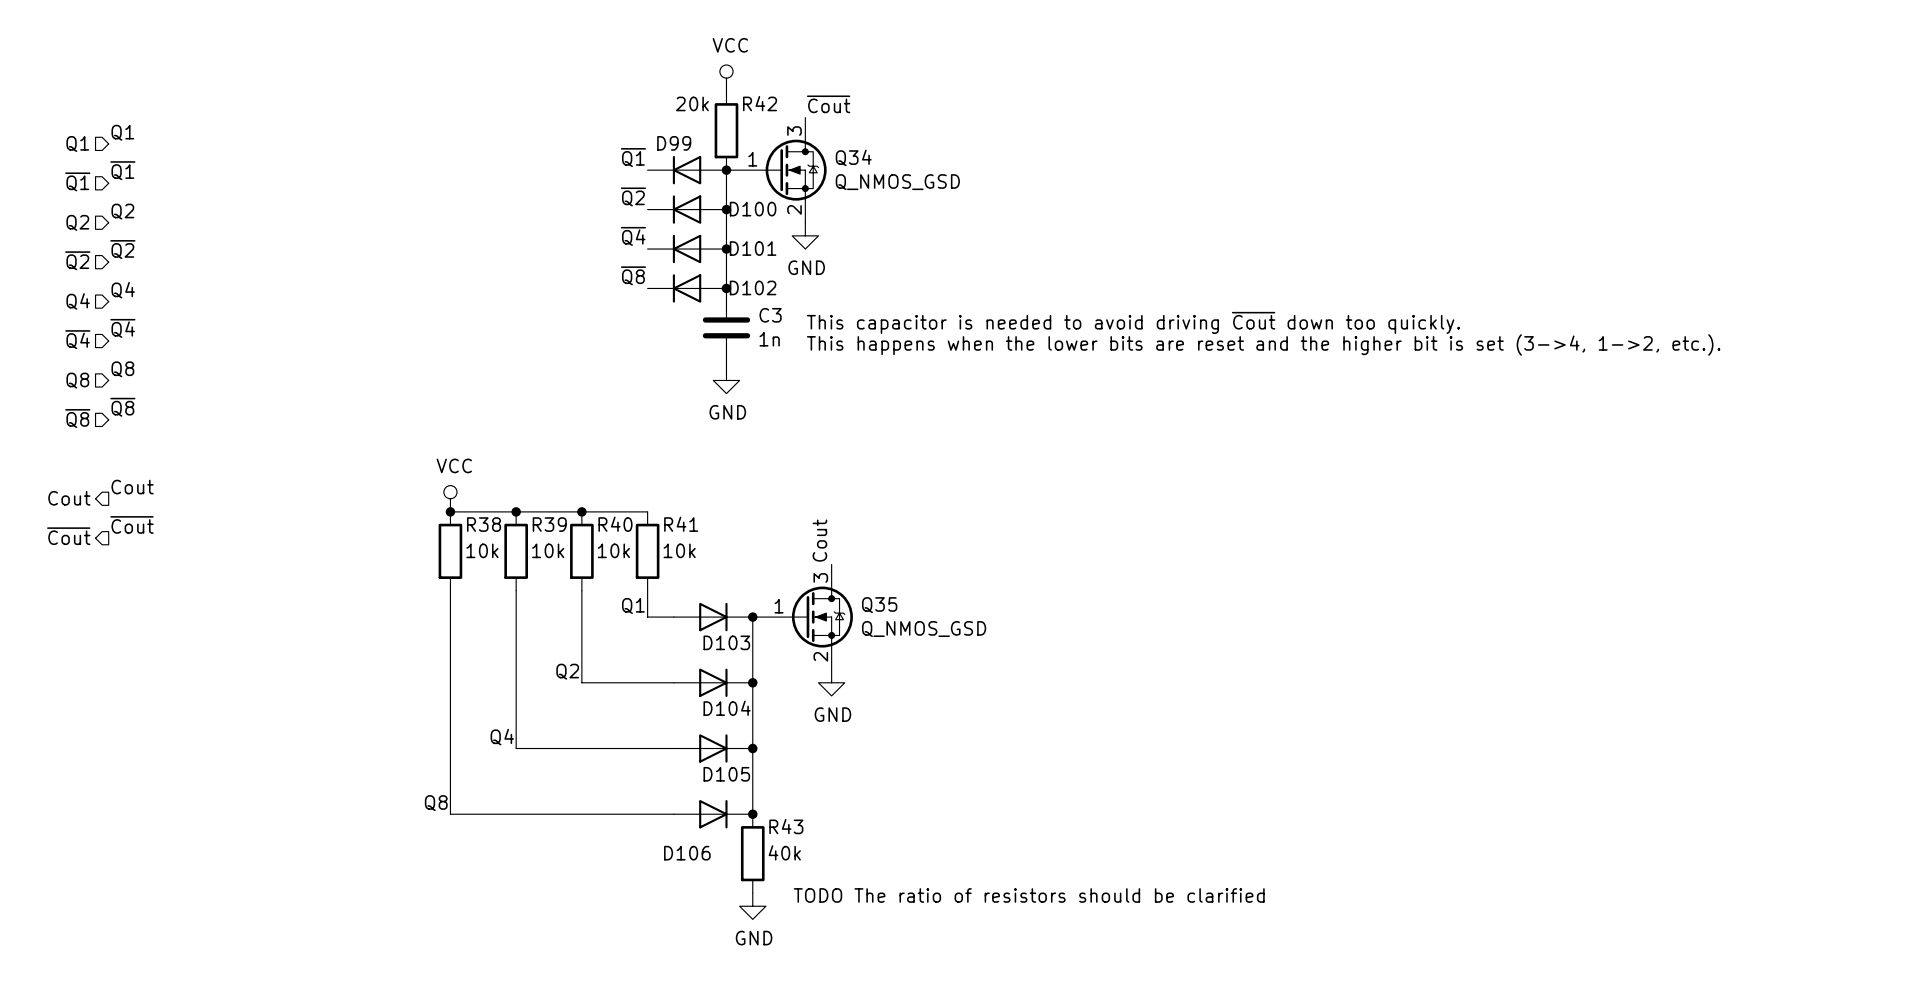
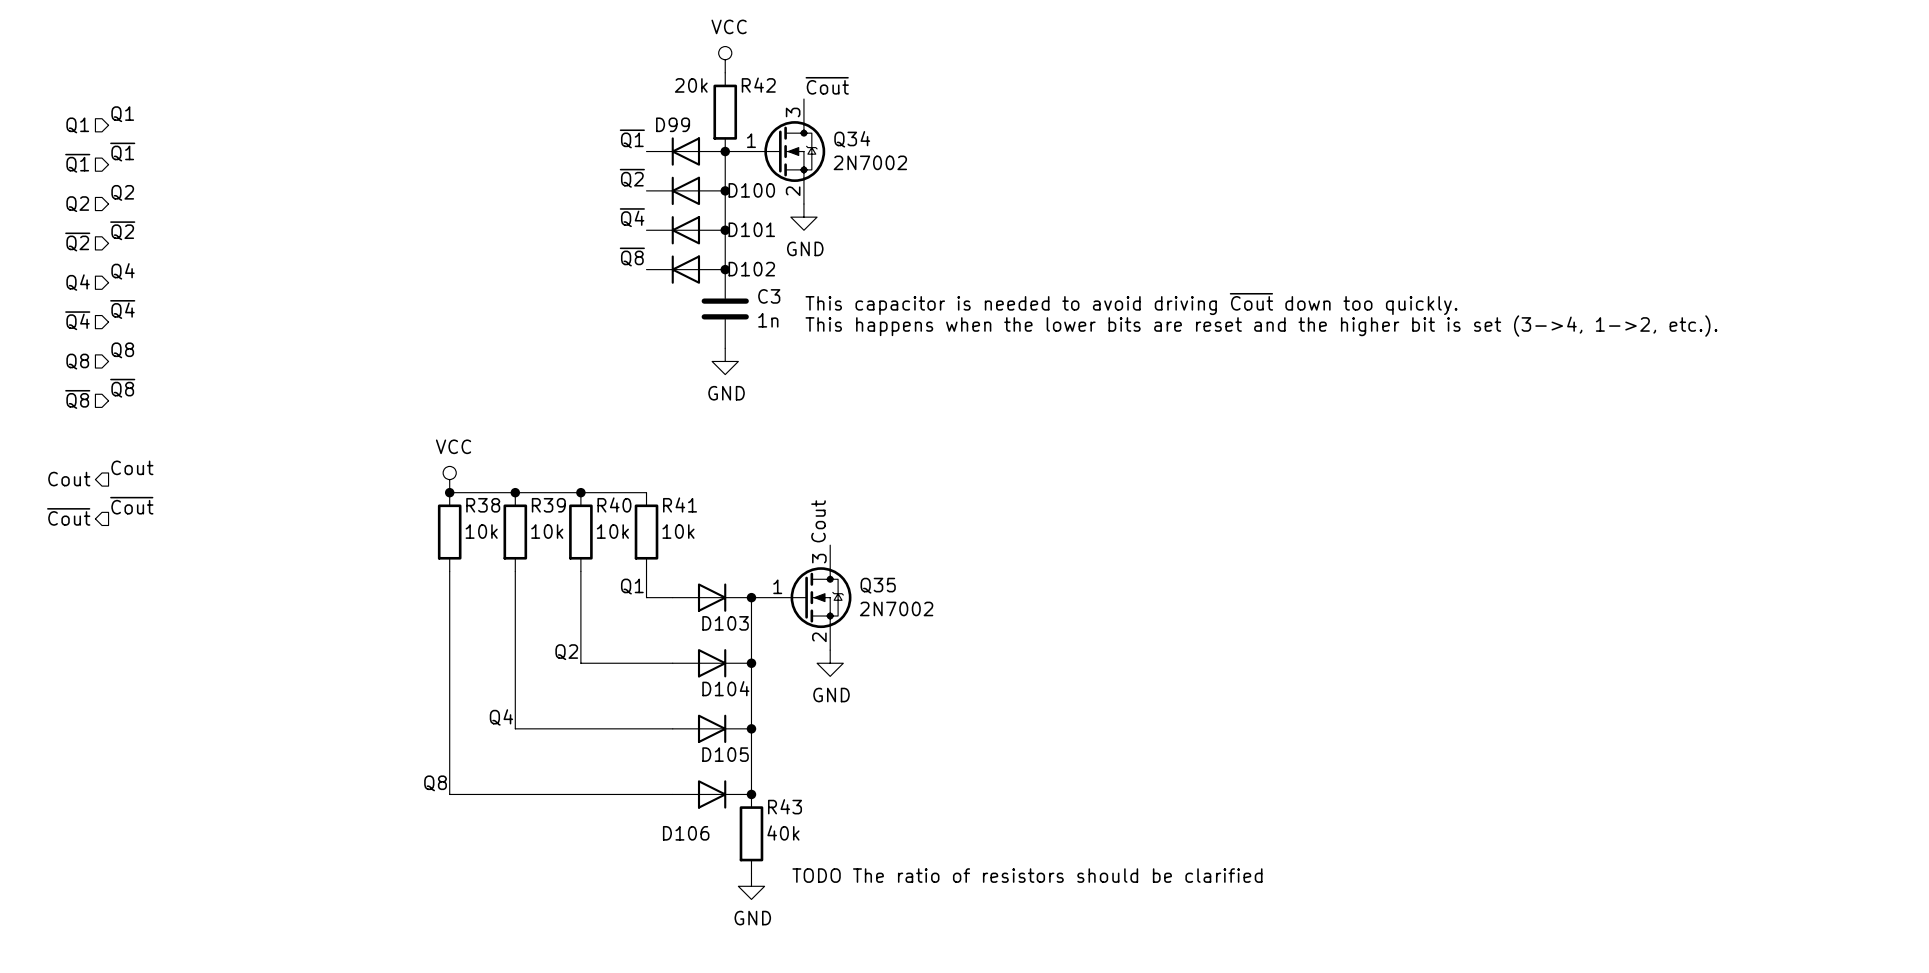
Q34 value: Q_NMOS_GSD (897, 182) -> 2N7002 (870, 162)
Q35 value: Q_NMOS_GSD (924, 629) -> 2N7002 (896, 608)

